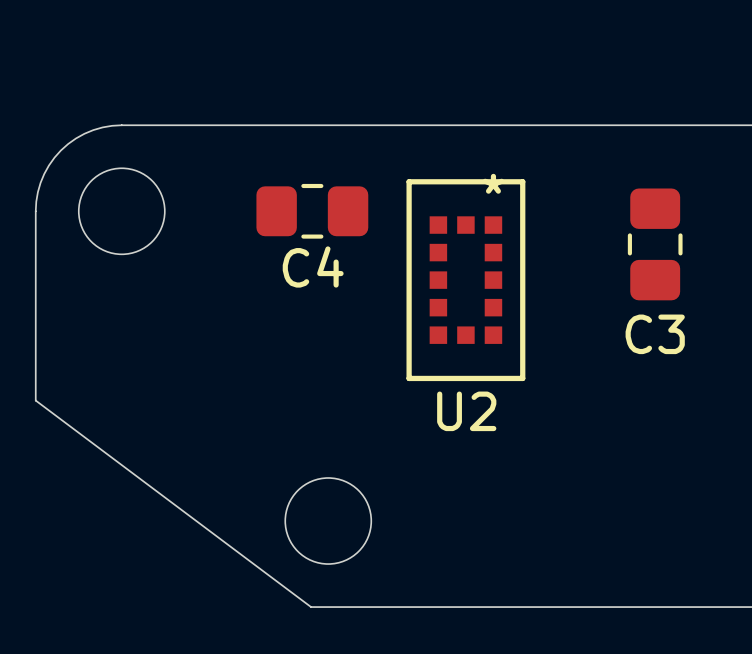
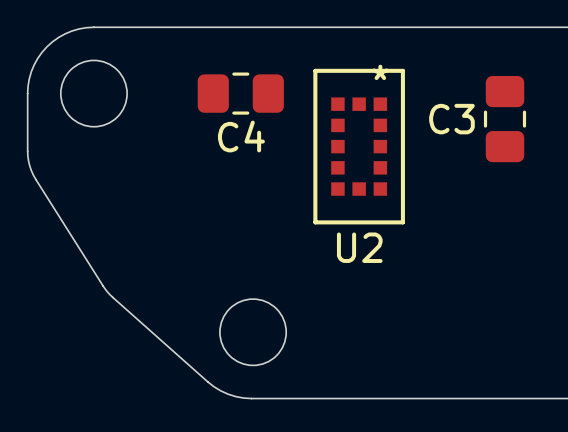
board edge: (35, 286) (35, 400) (311, 607) (326, 607) -> (27, 151) (33, 175) (107, 292) (214, 386) (235, 396) (251, 398)
C3 name position: C3 (655, 334) -> C3 (451, 119)

